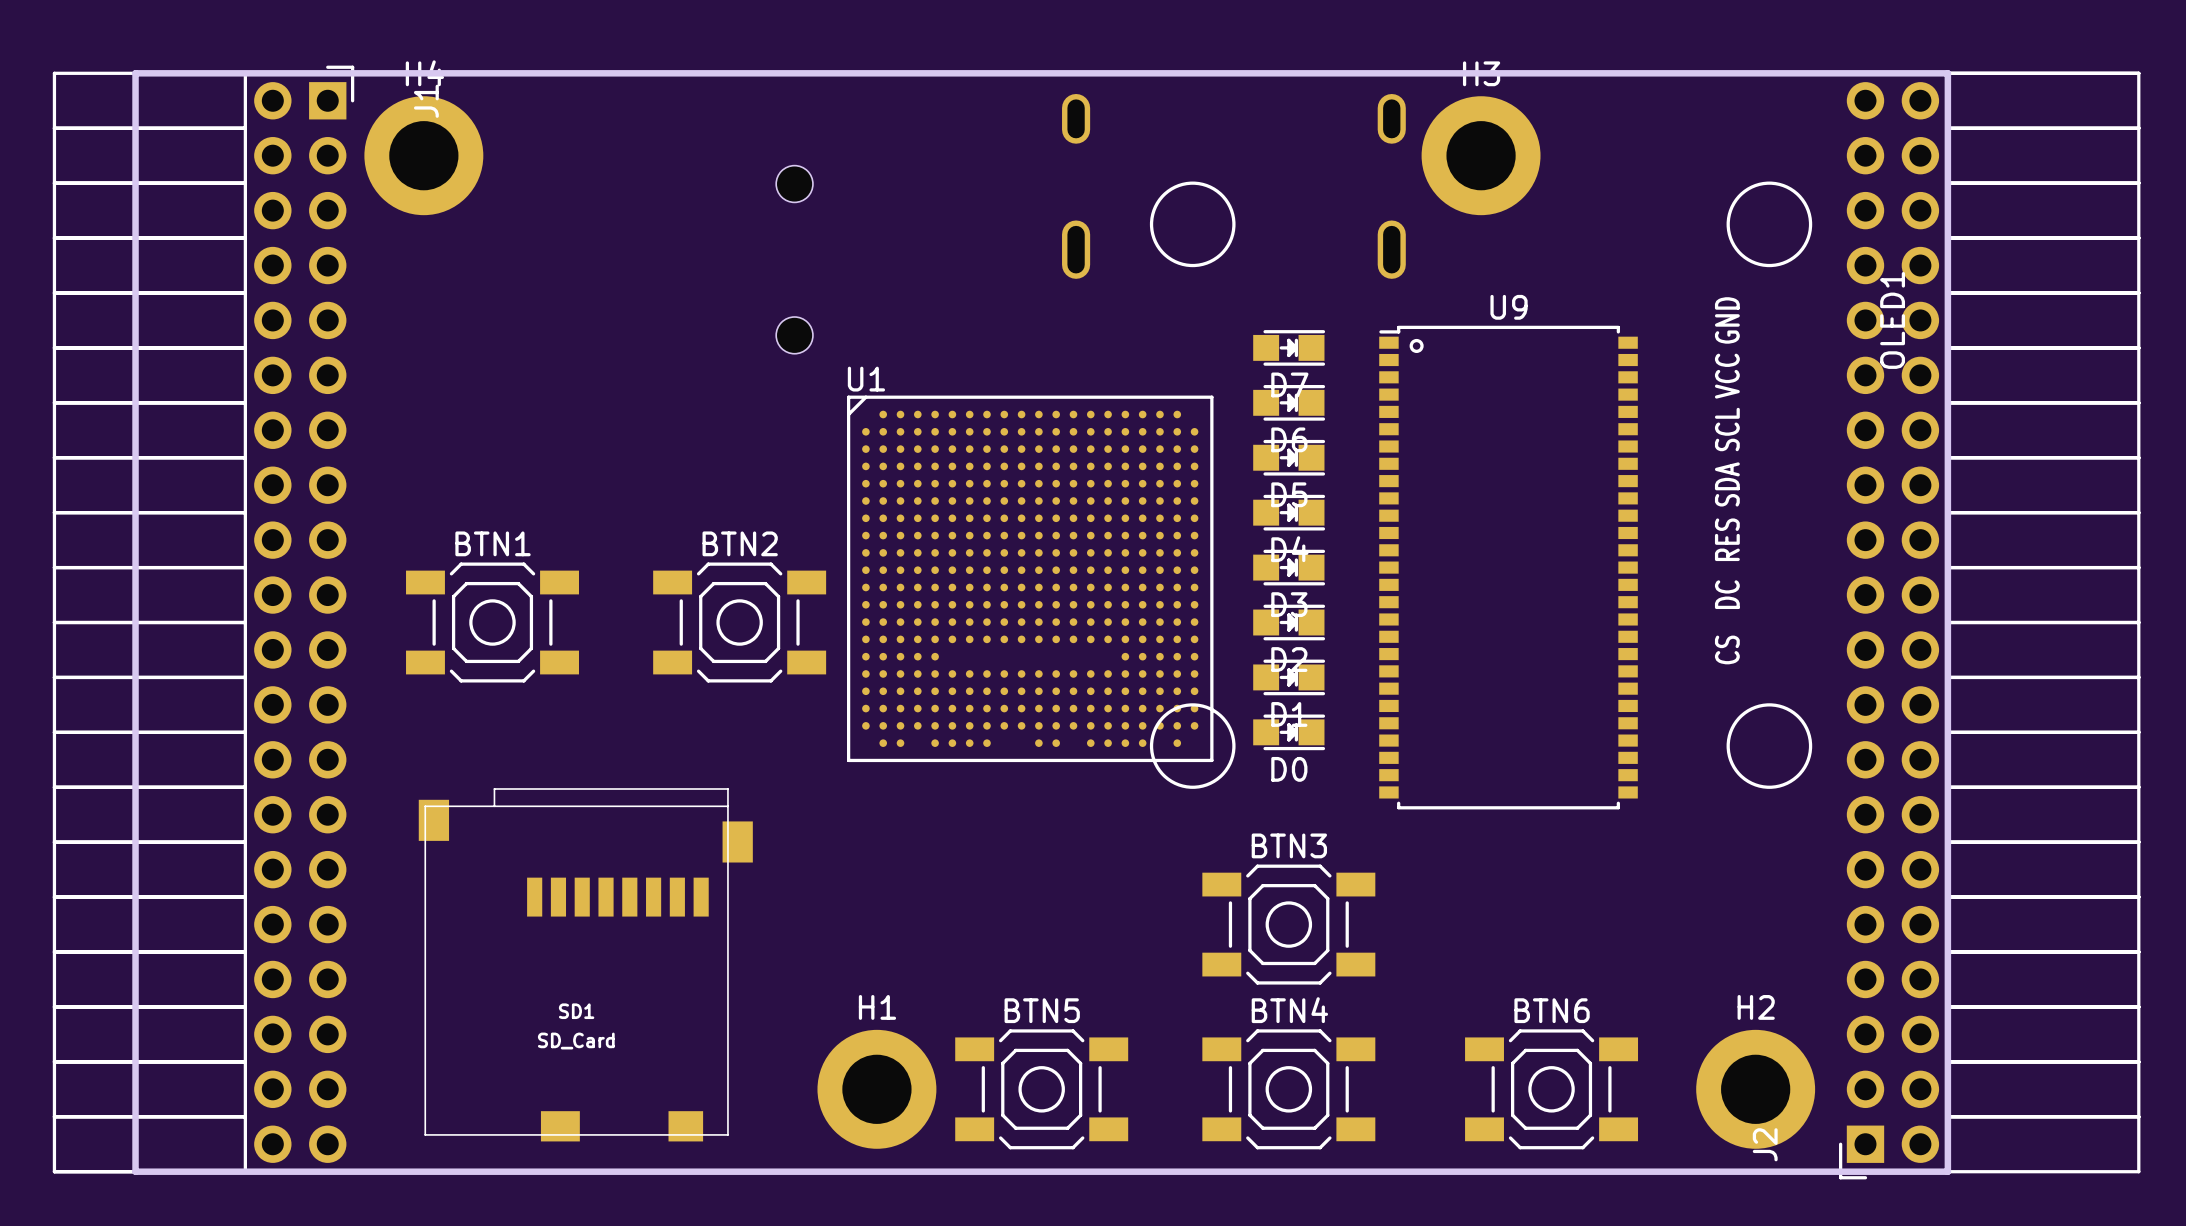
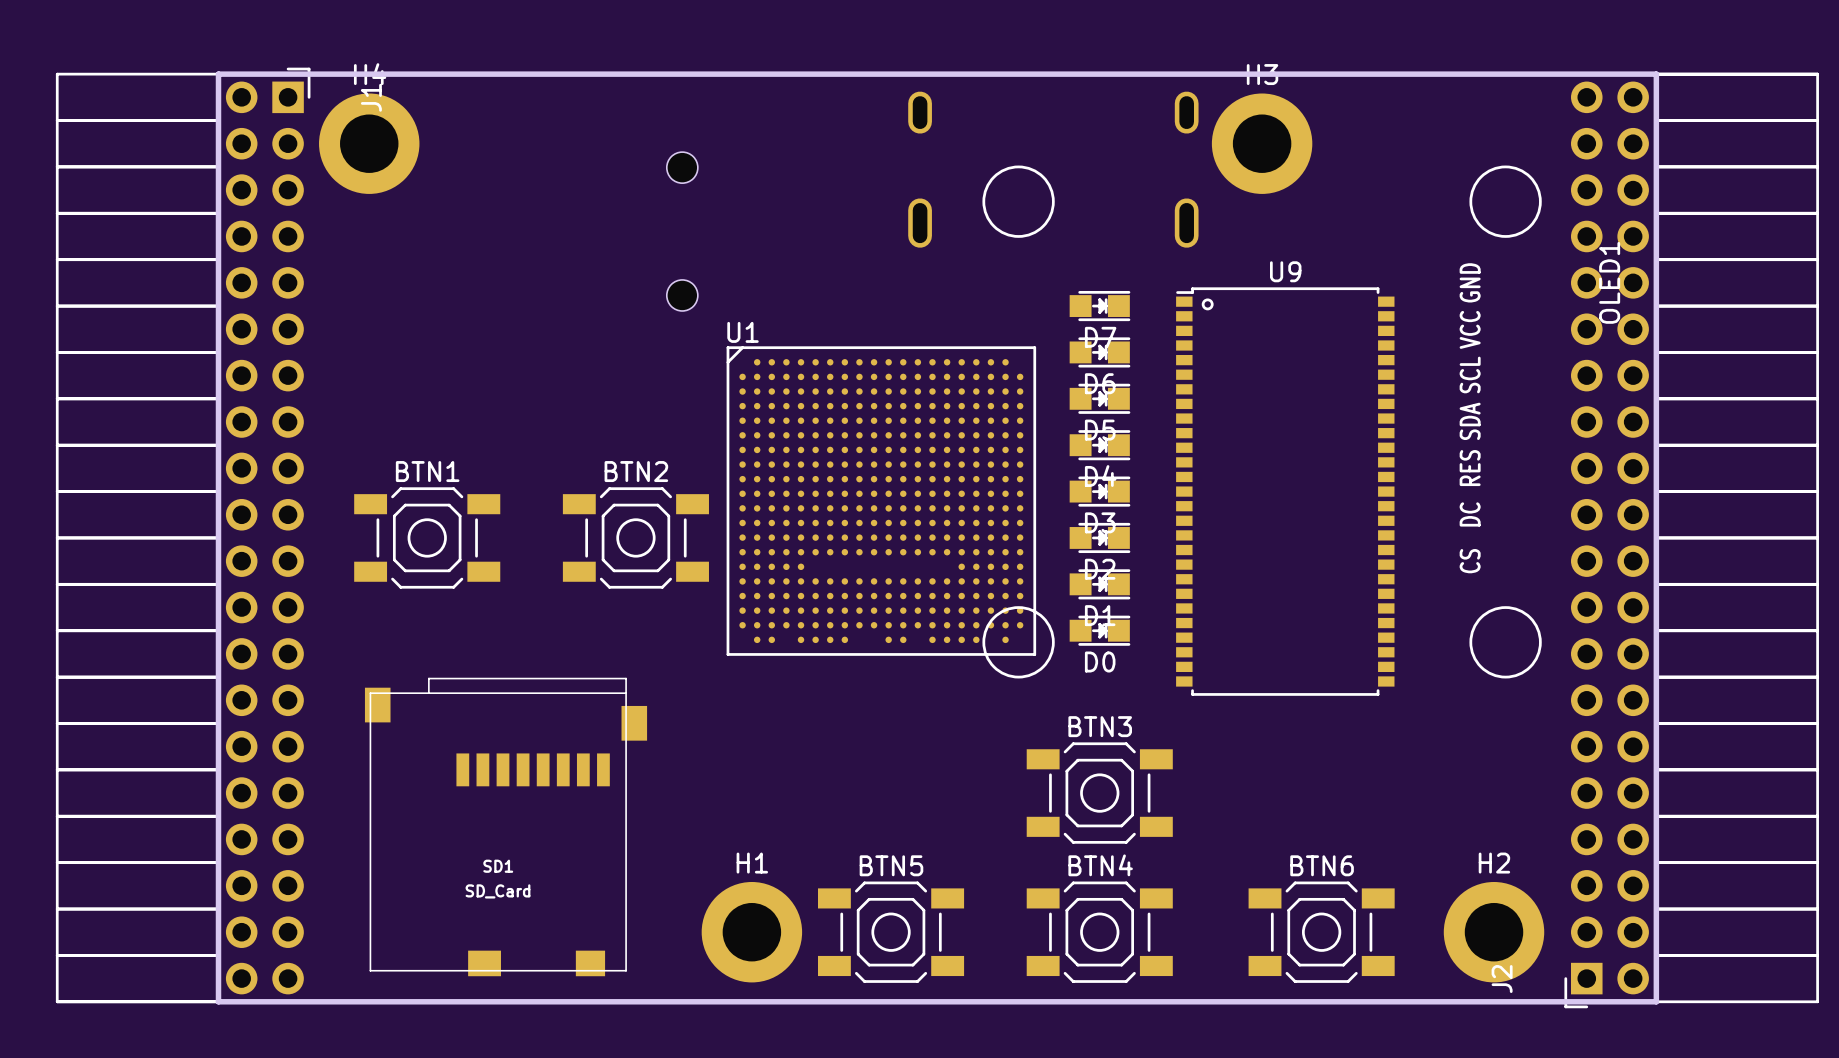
board edge: (245, 73) (135, 73) (135, 1171) (245, 1171) -> (218, 74) (218, 1001)

